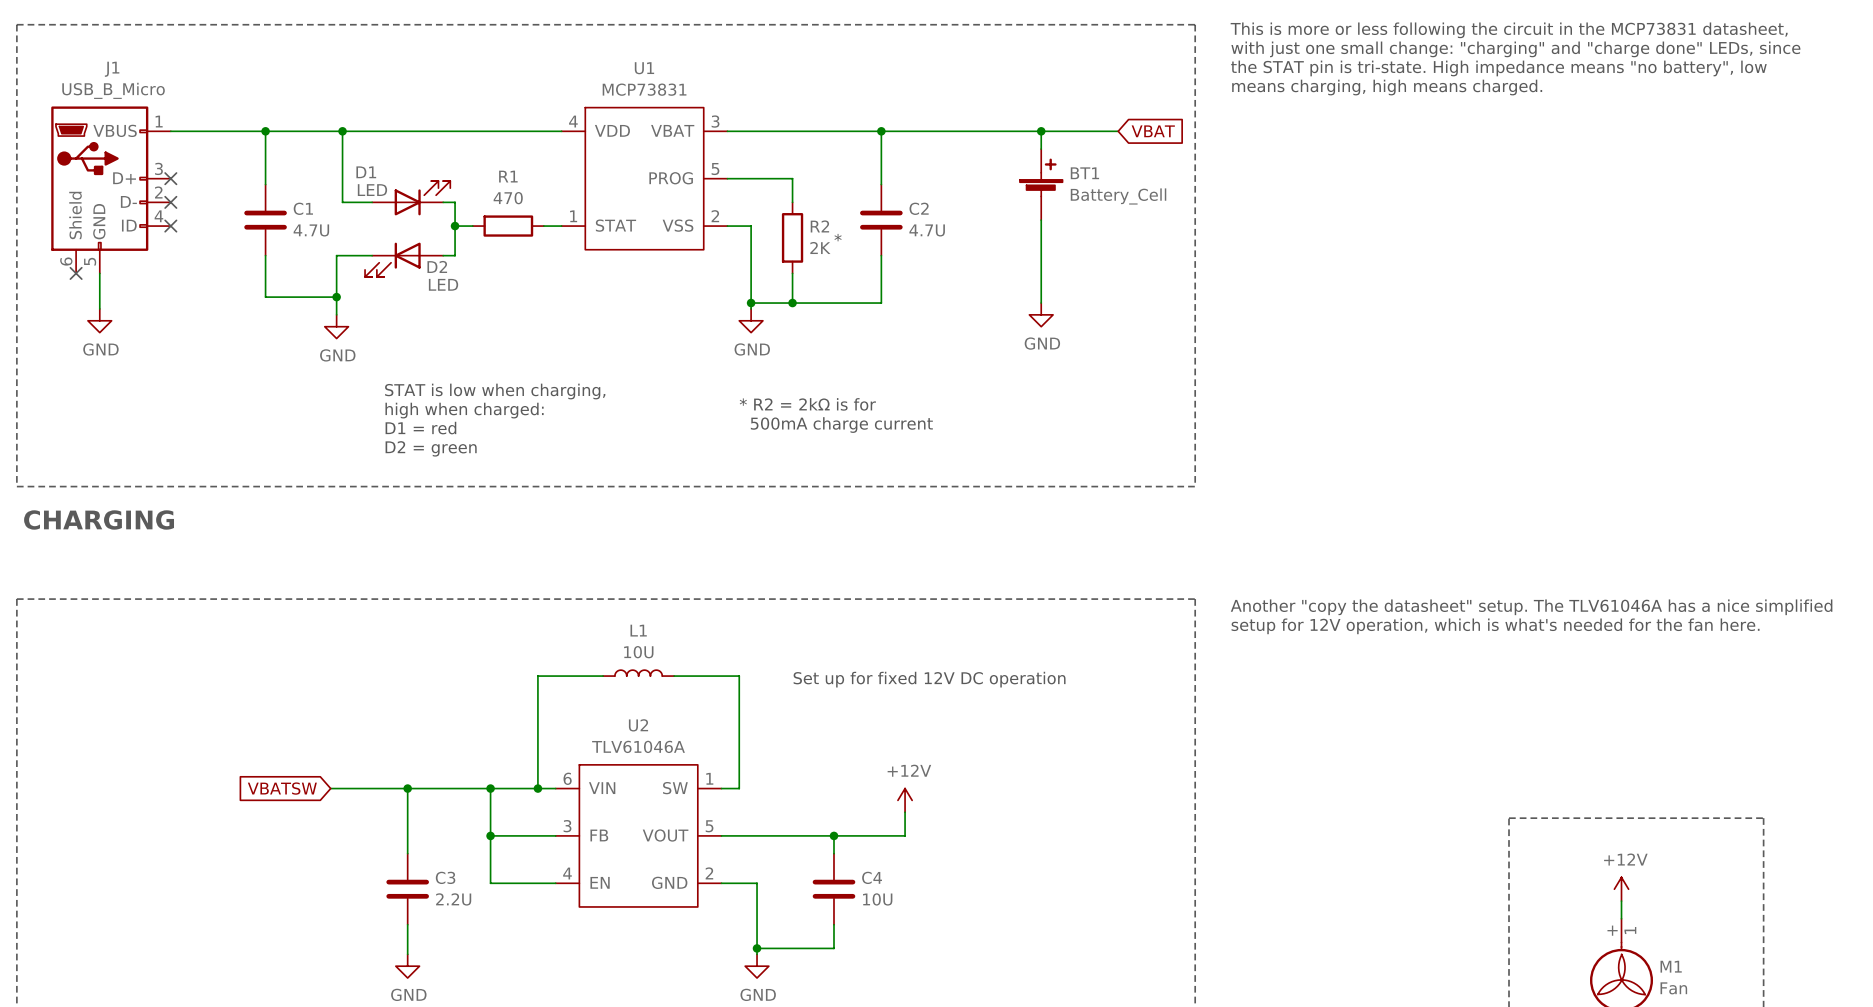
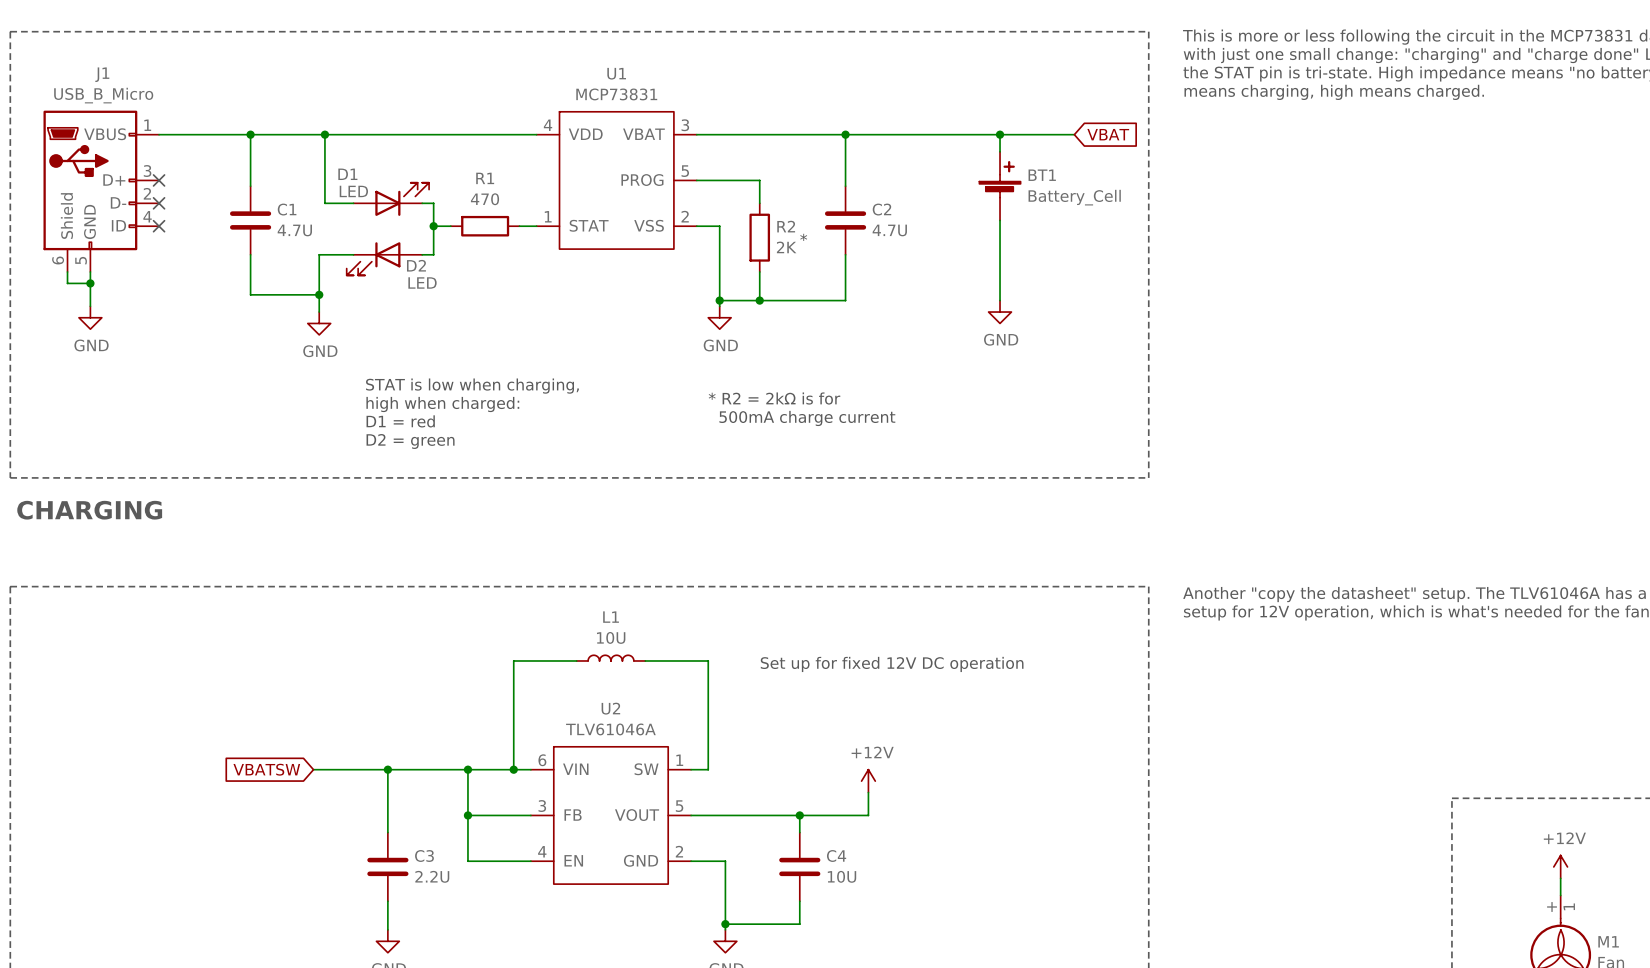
wire: none -> (67, 271) (67, 283) (90, 283)
no-connect mark: (76, 273) -> none
junction: none -> (90, 283)

